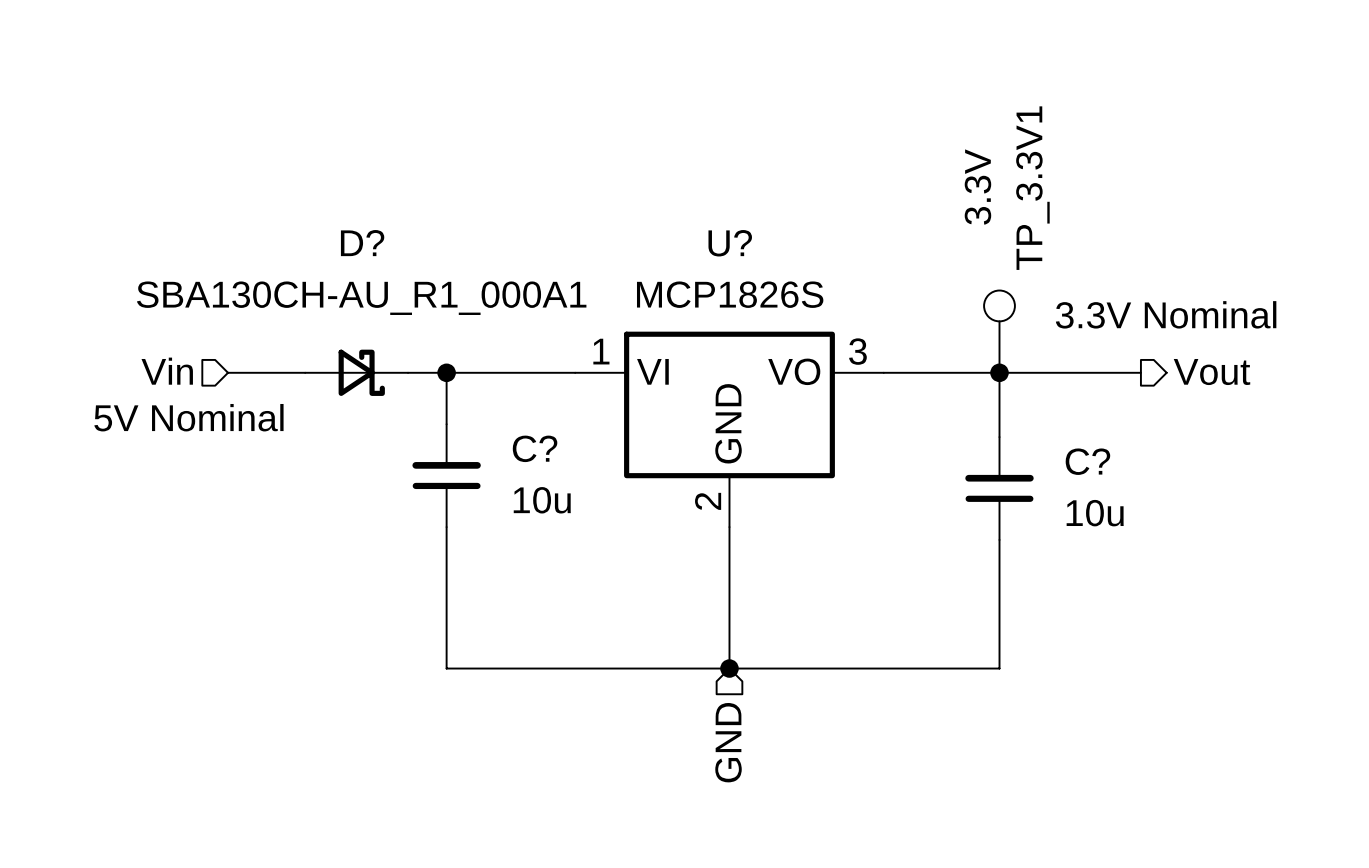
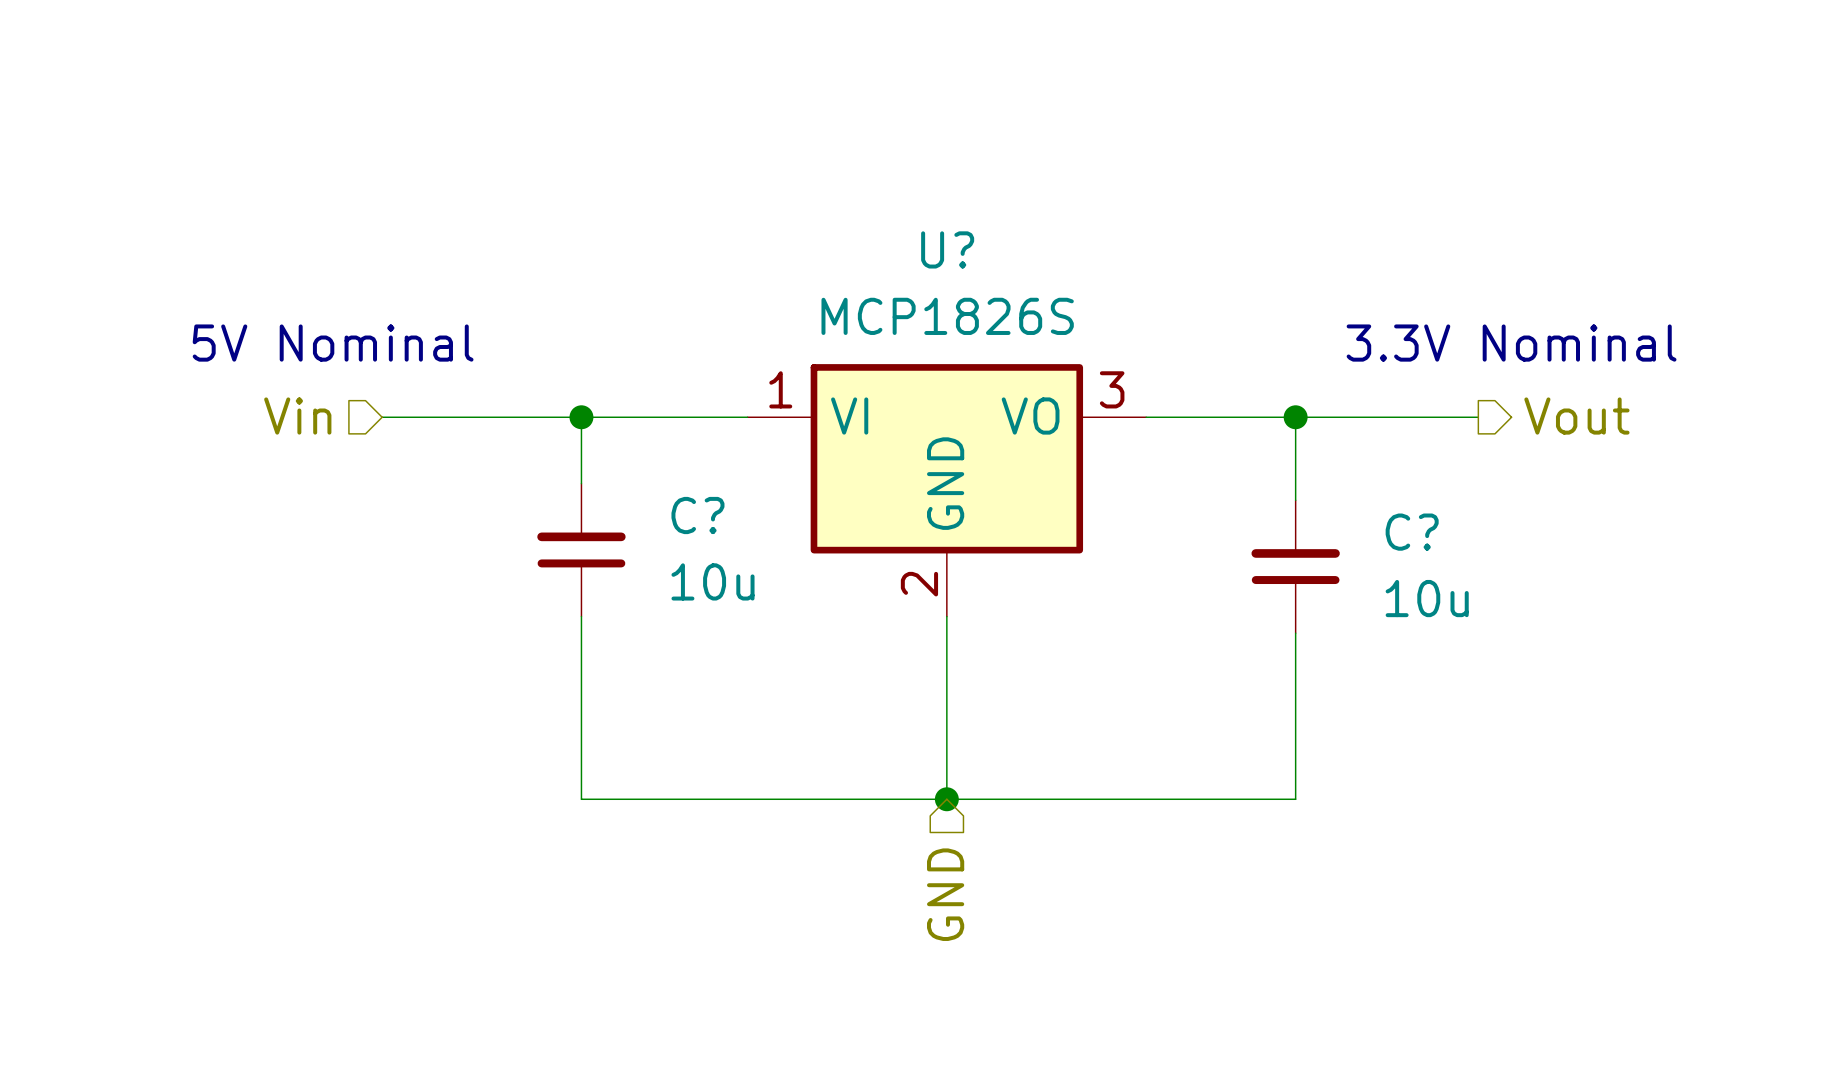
TP_3.3V1: 3.3V (999, 331) -> none
hierarchical label position: Vin (167, 371) -> Vin (297, 416)
wire: (228, 372) (292, 372) -> none
D?: SBA130CH-AU_R1_000A1 (356, 372) -> none
text position: 5V Nominal (188, 417) -> 5V Nominal (333, 343)

